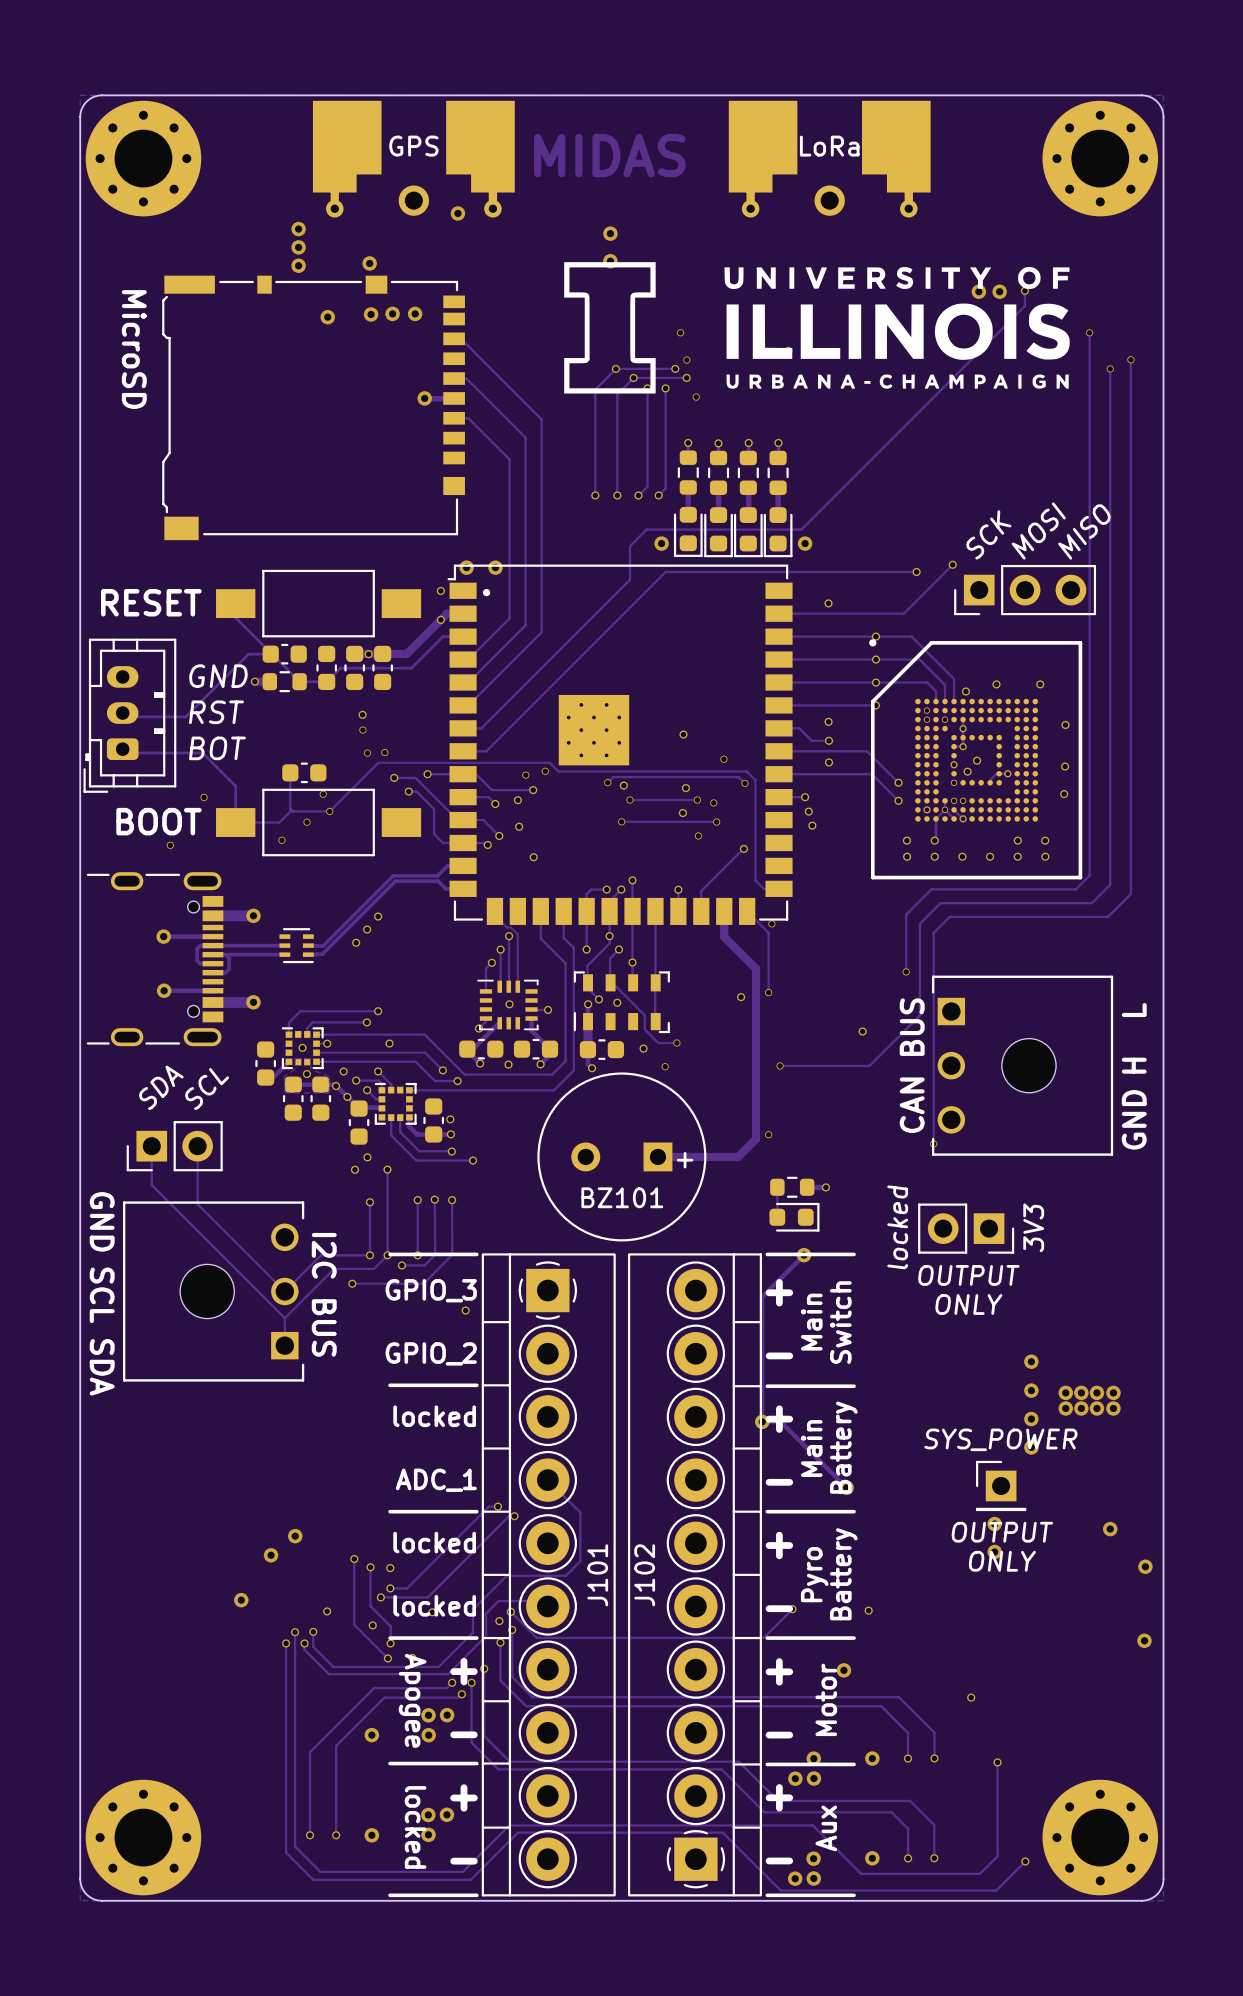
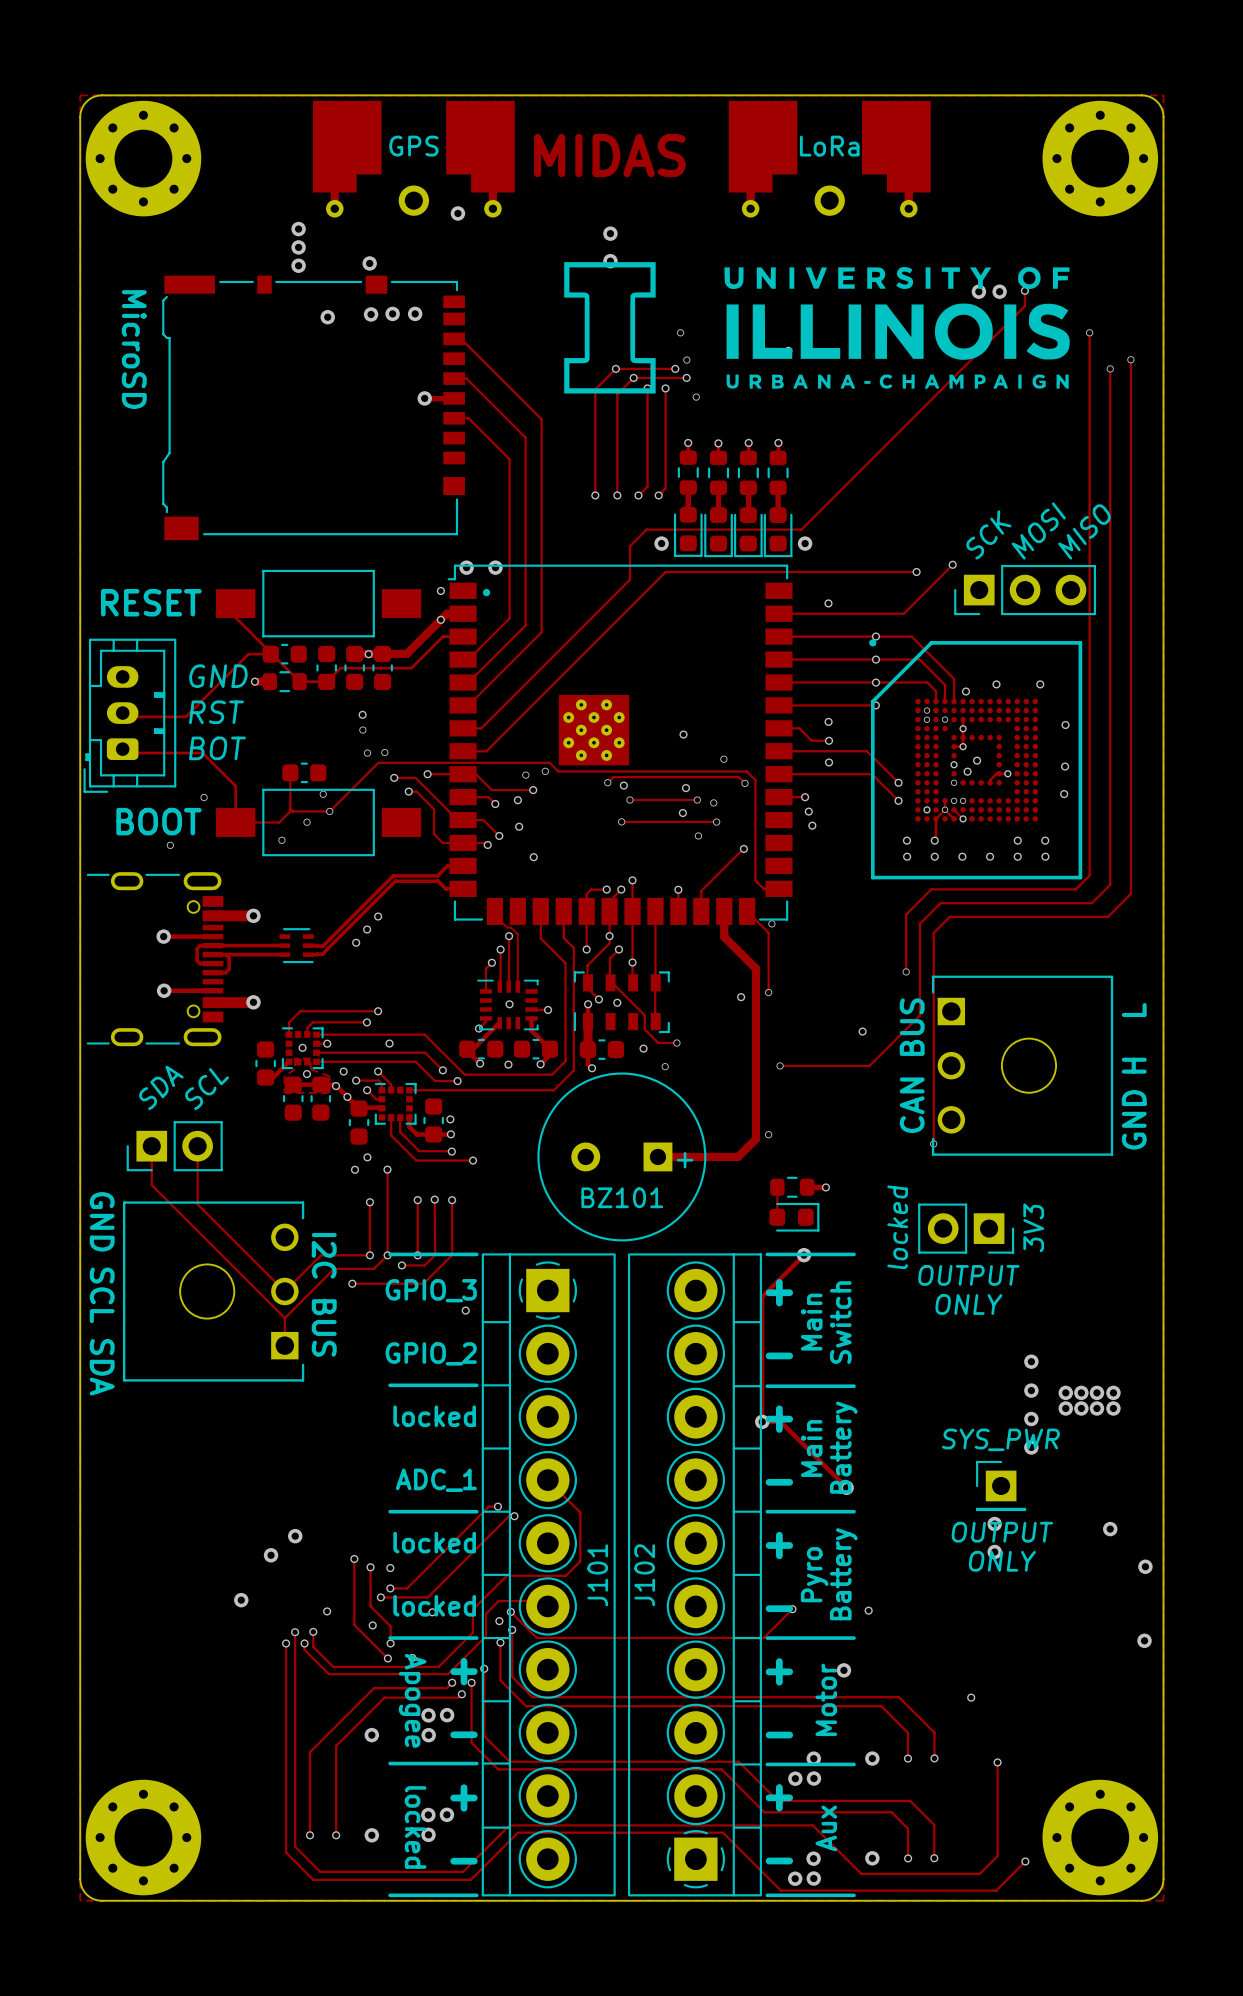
text: SYS_POWER (1000, 1439) -> SYS_PWR (1000, 1439)

